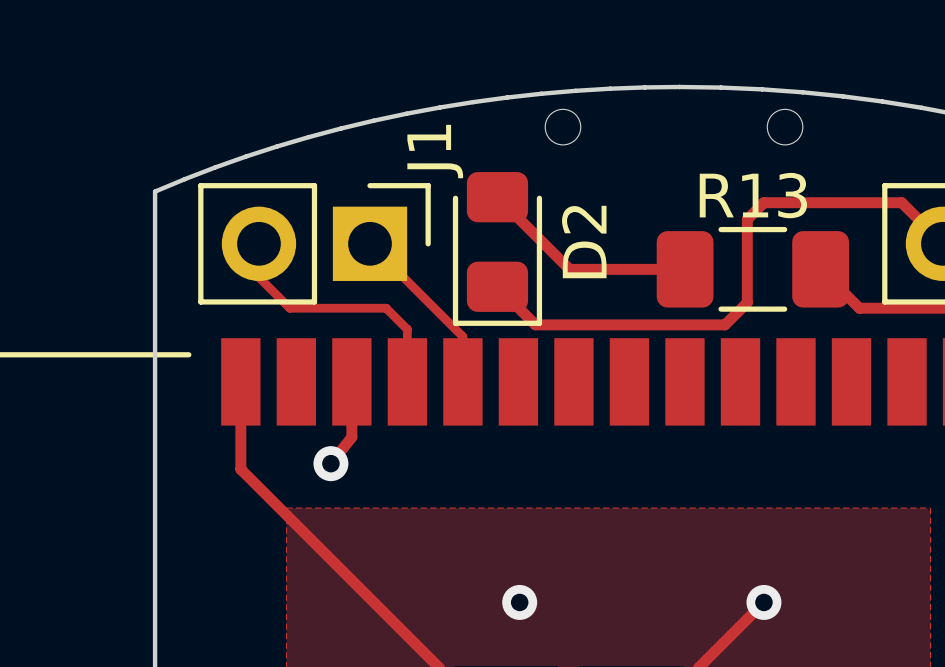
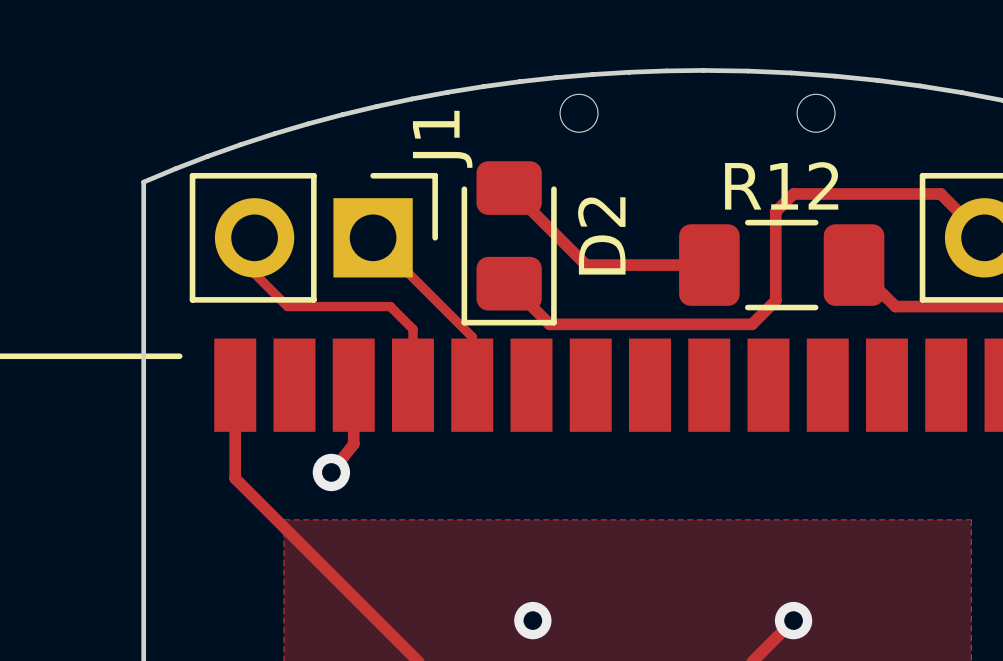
R13 name: R13 (753, 195) -> R12 (781, 185)

